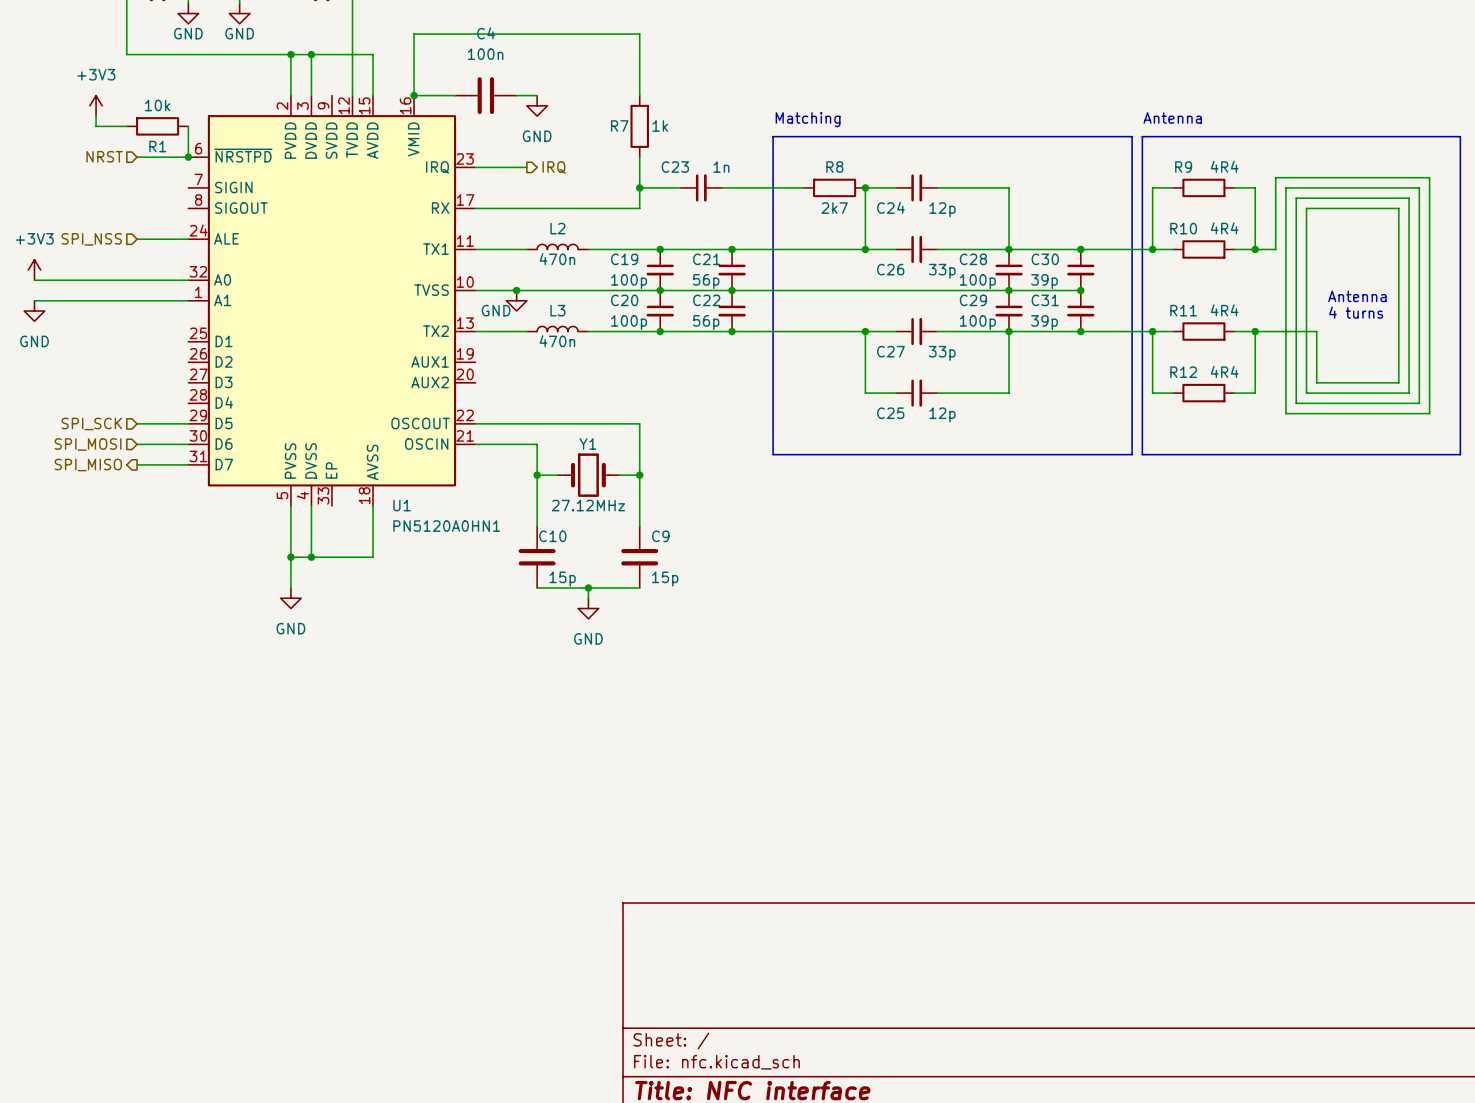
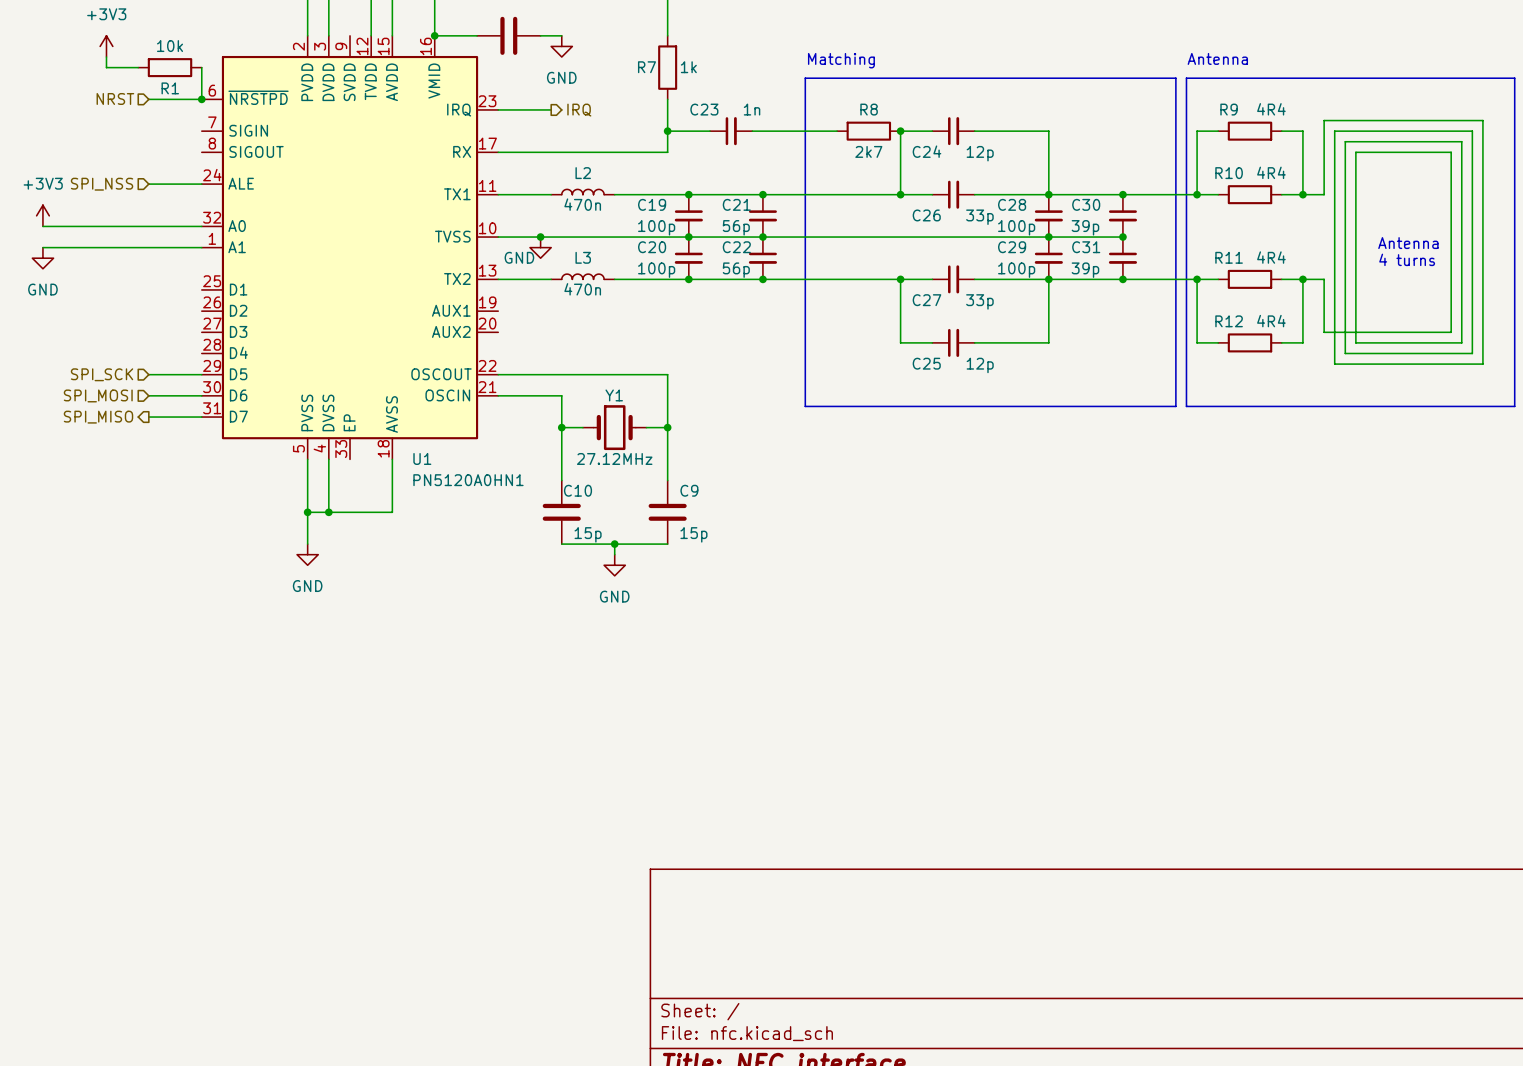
wire: (1275, 331) (1316, 331) (1316, 382) -> (1324, 279) (1324, 332) (1366, 332)

